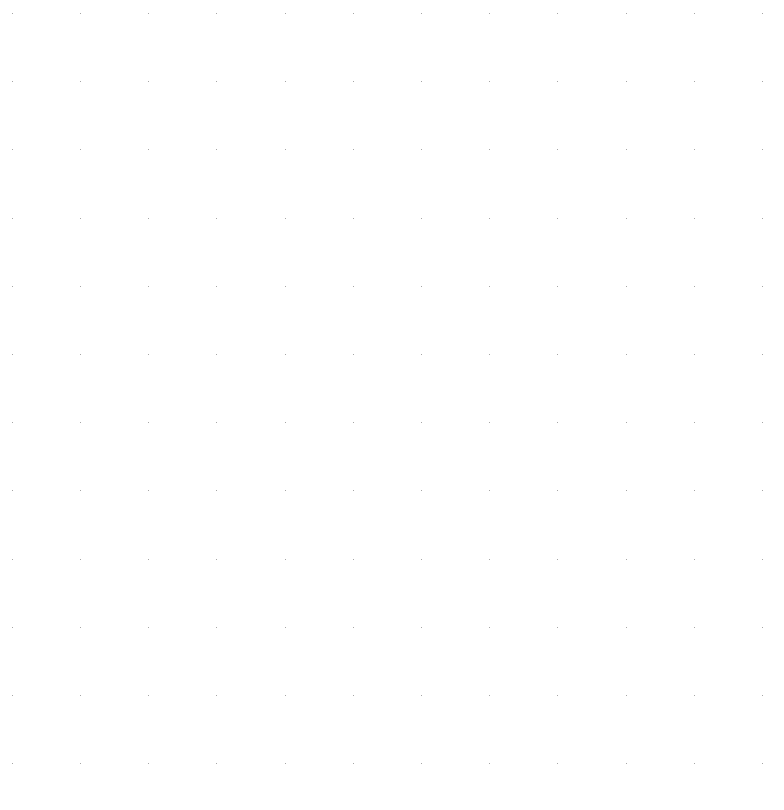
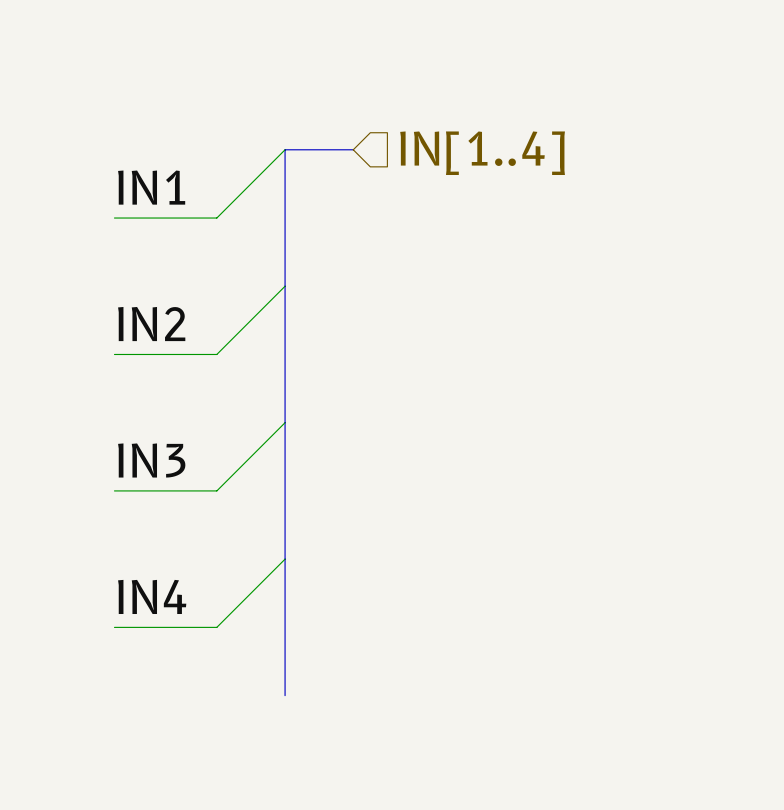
wire: none -> (285, 149) (216, 218) (114, 218)
bus: none -> (353, 149) (285, 149) (285, 695)
hierarchical label: none -> IN[1..4] (482, 153)
label: none -> IN1 (151, 187)
wire: none -> (285, 286) (216, 354) (114, 354)
label: none -> IN2 (151, 324)
wire: none -> (285, 422) (216, 490) (114, 490)
label: none -> IN3 (151, 460)
wire: none -> (285, 559) (216, 627) (114, 627)
label: none -> IN4 (152, 596)

